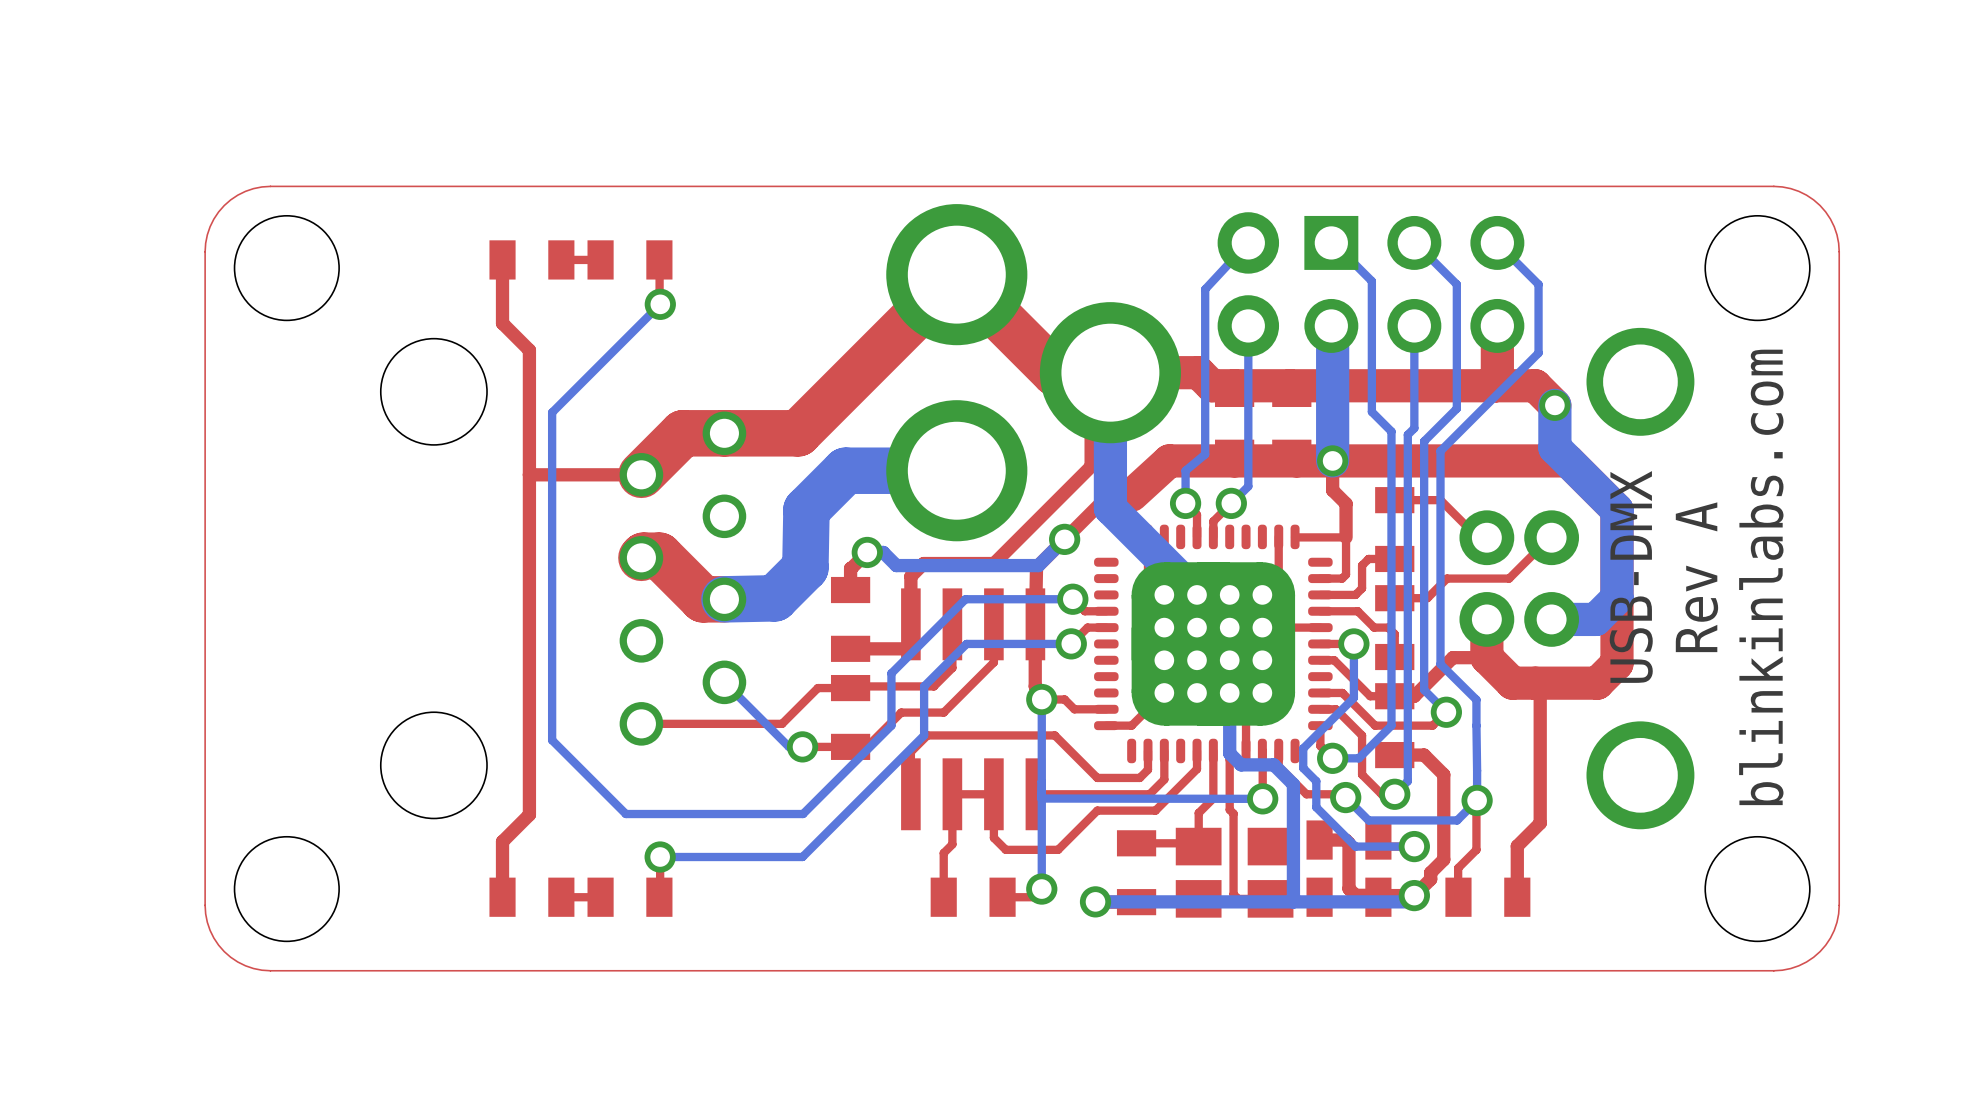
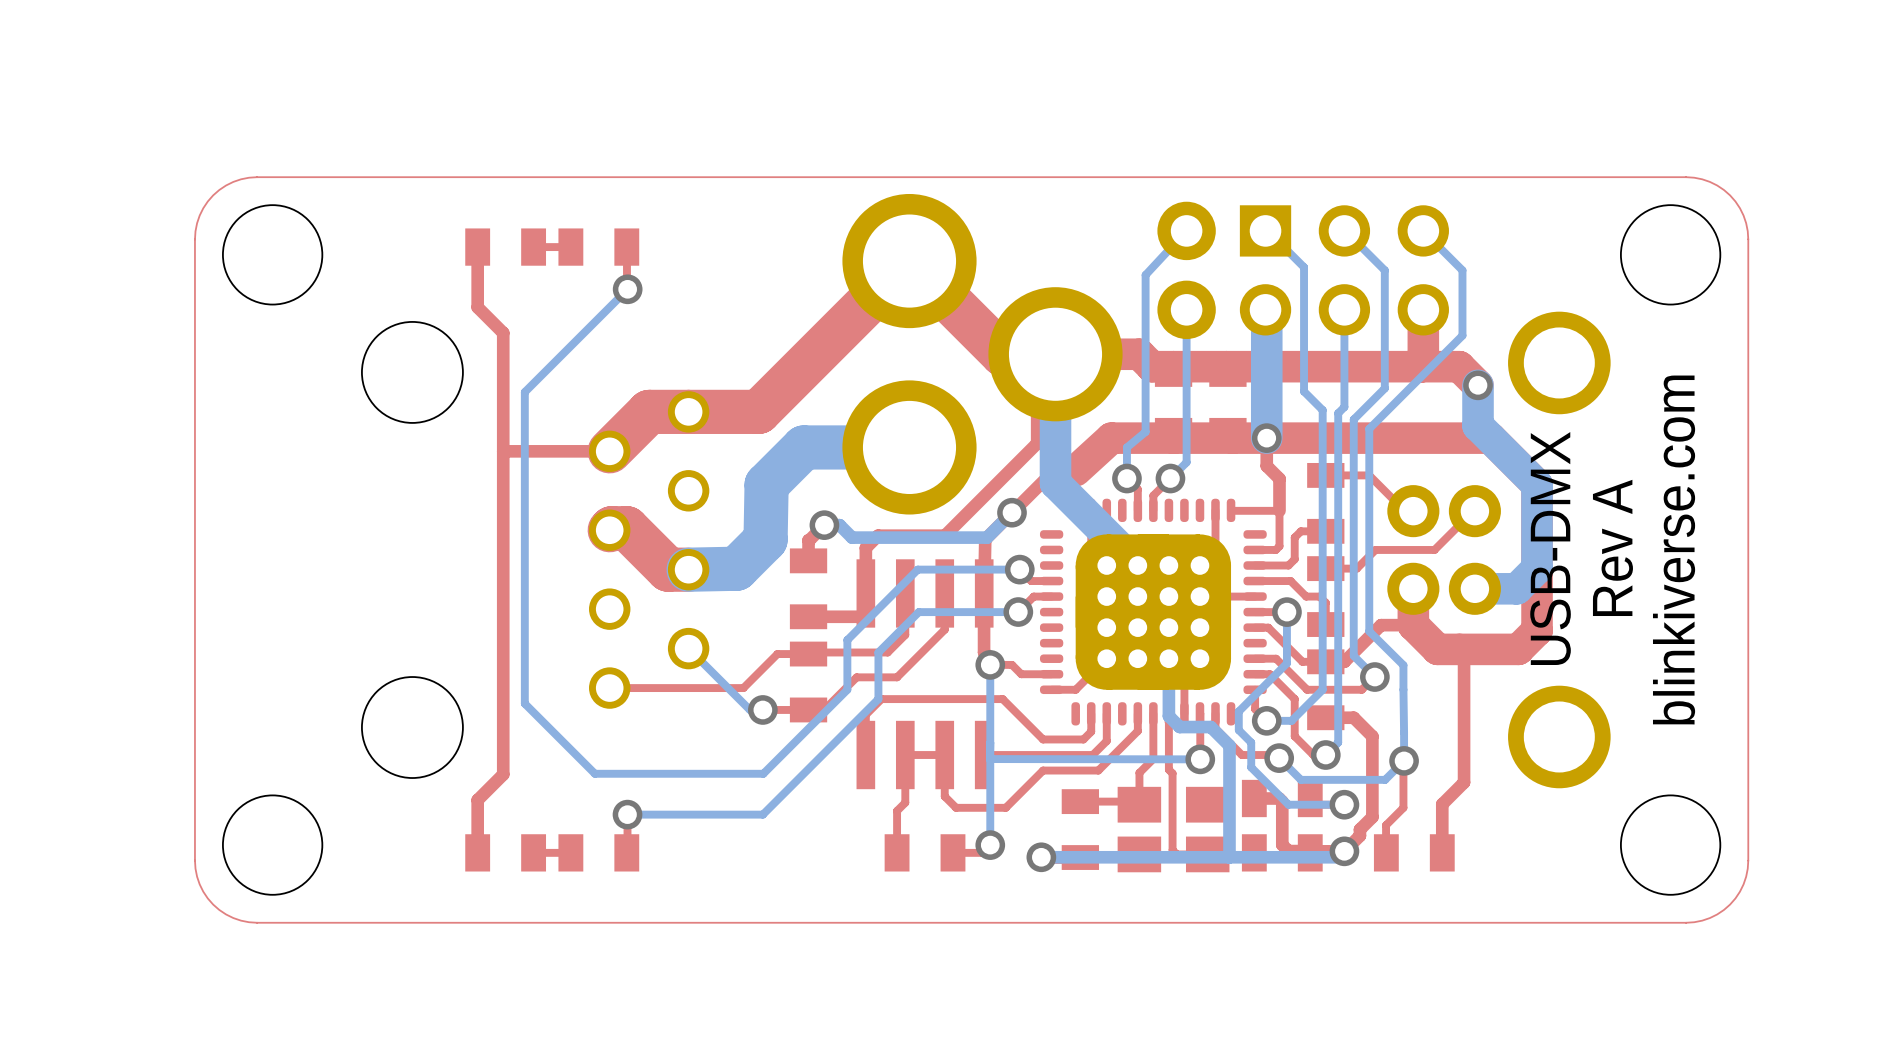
text: blinkinlabs.com (1761, 577) -> blinkiverse.com (1674, 550)

